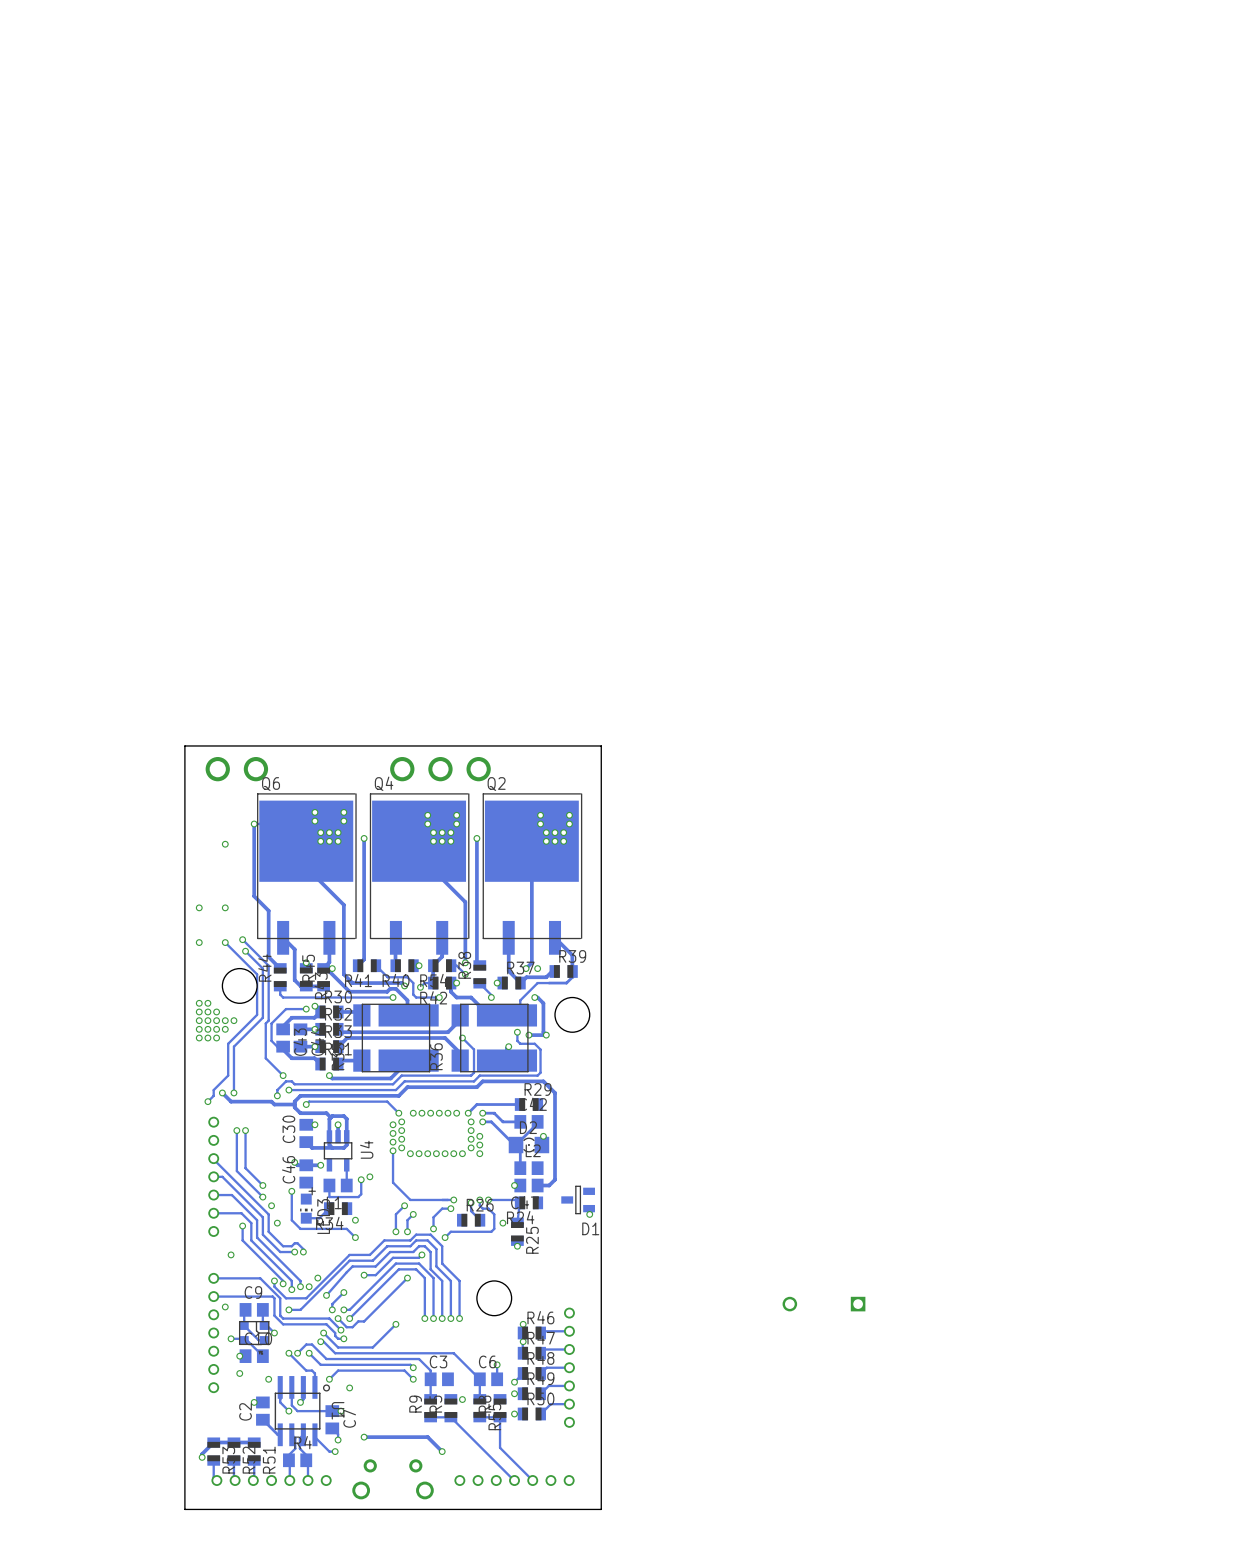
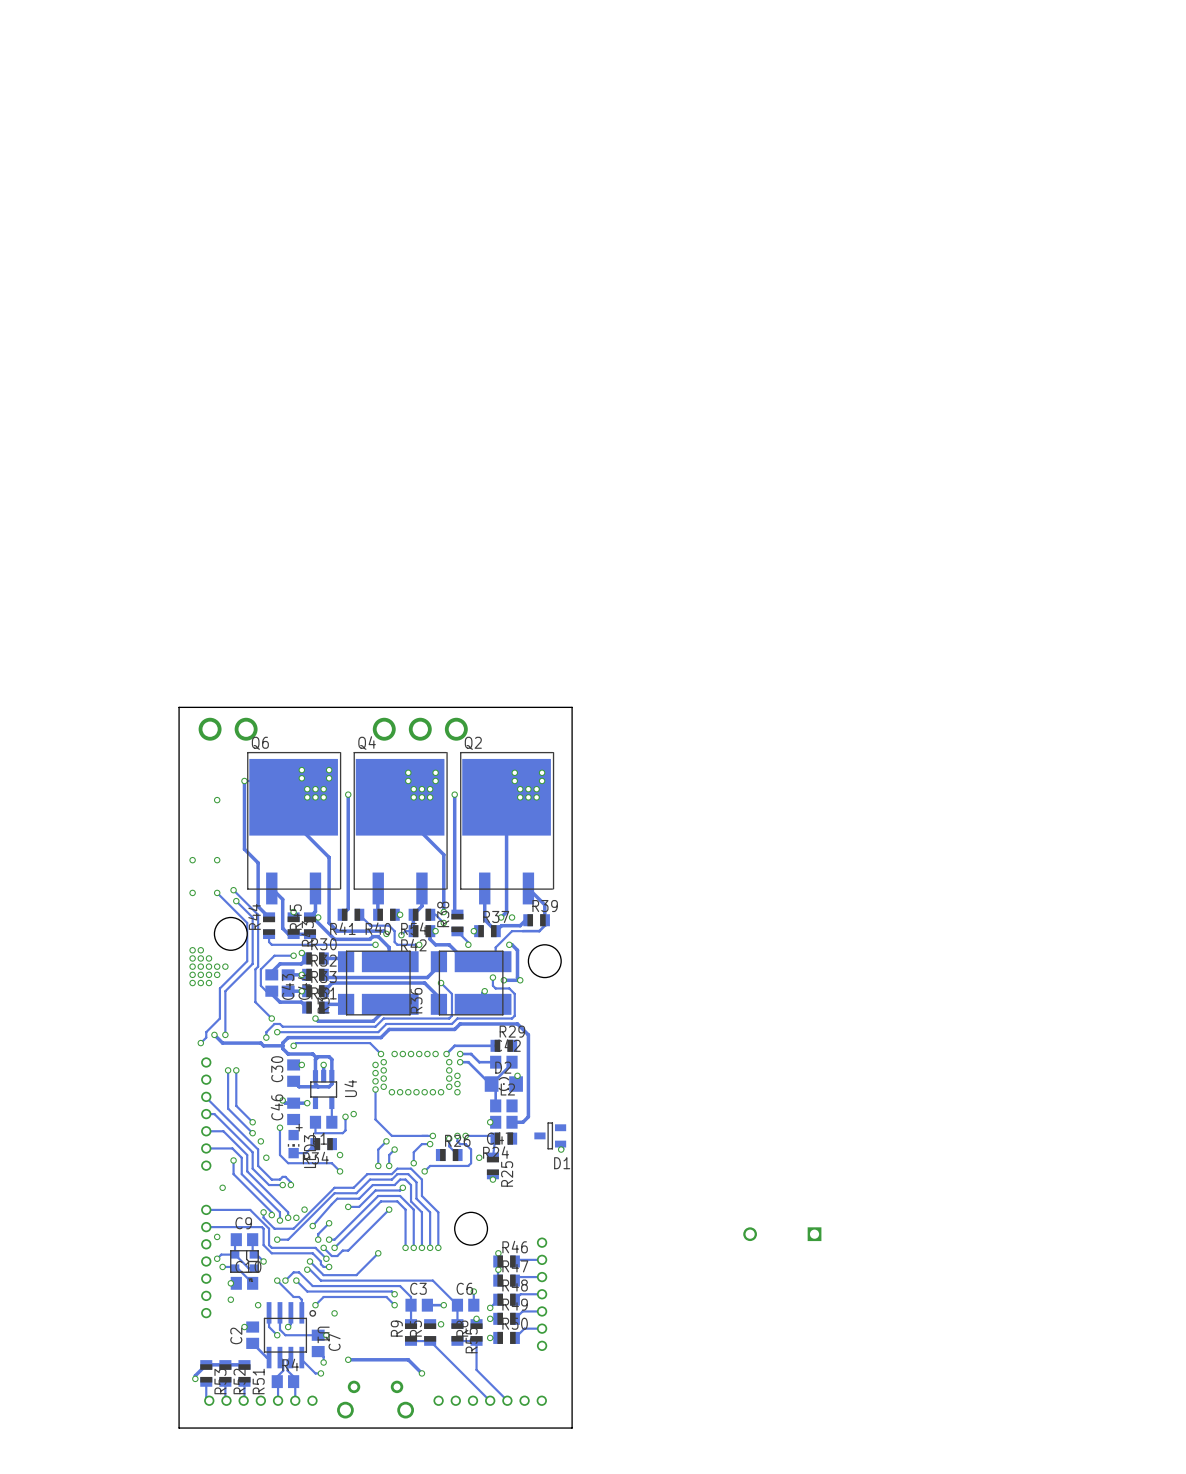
track: none -> (235, 1254) (221, 1254) (217, 1258)
via: none -> (217, 1258)
track: none -> (443, 1305) (427, 1305)
via: none -> (443, 1305)
via: none -> (476, 1318)

